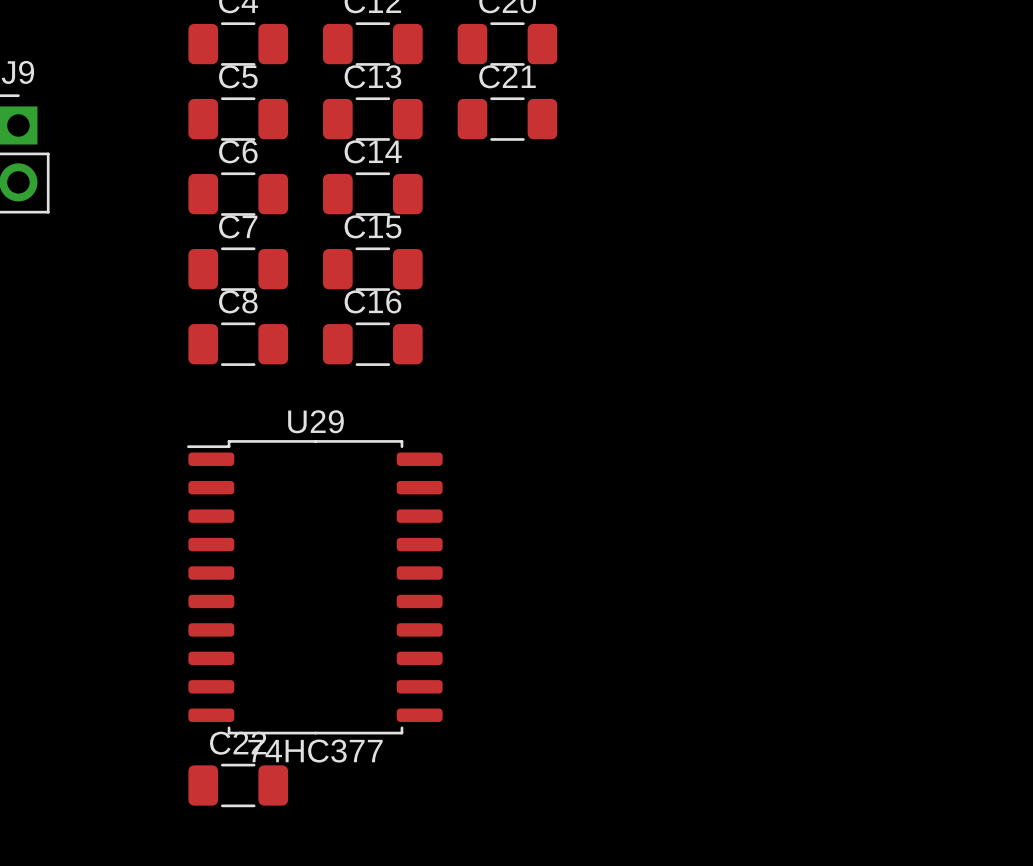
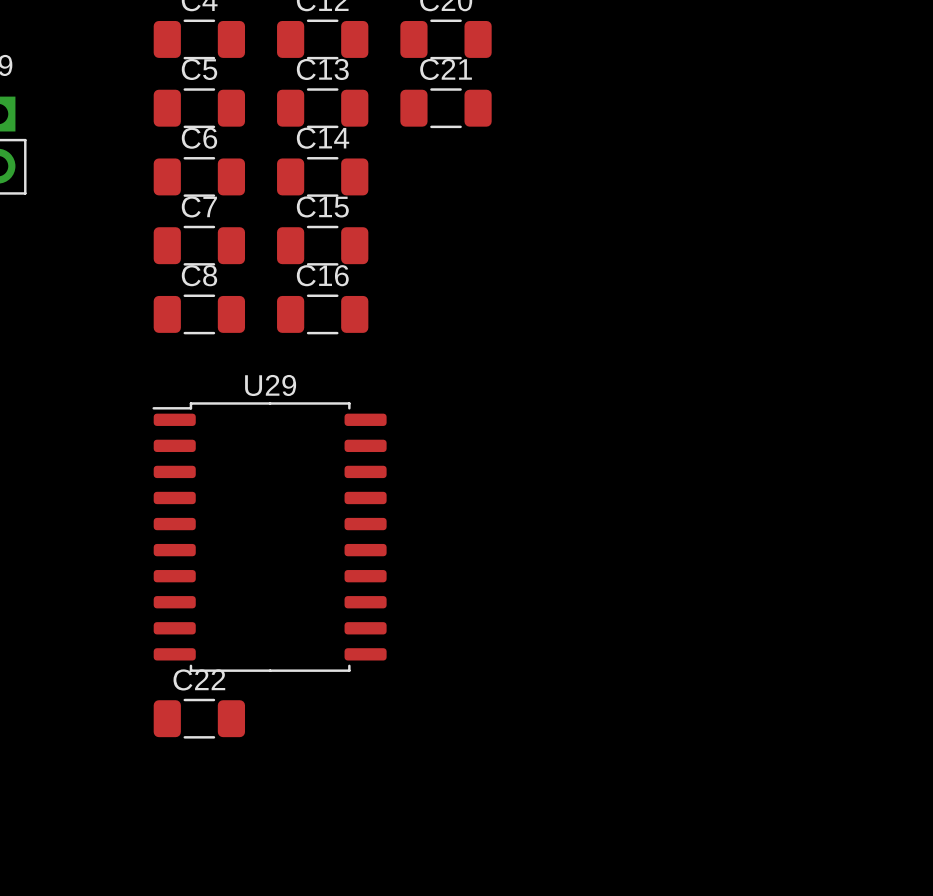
U29 value: 74HC377 (315, 751) -> none

